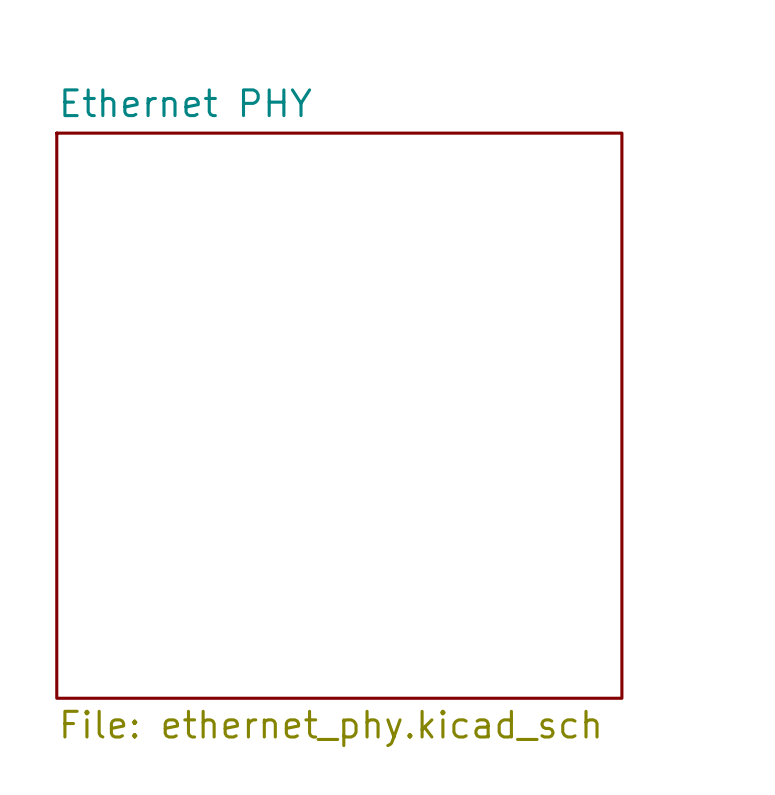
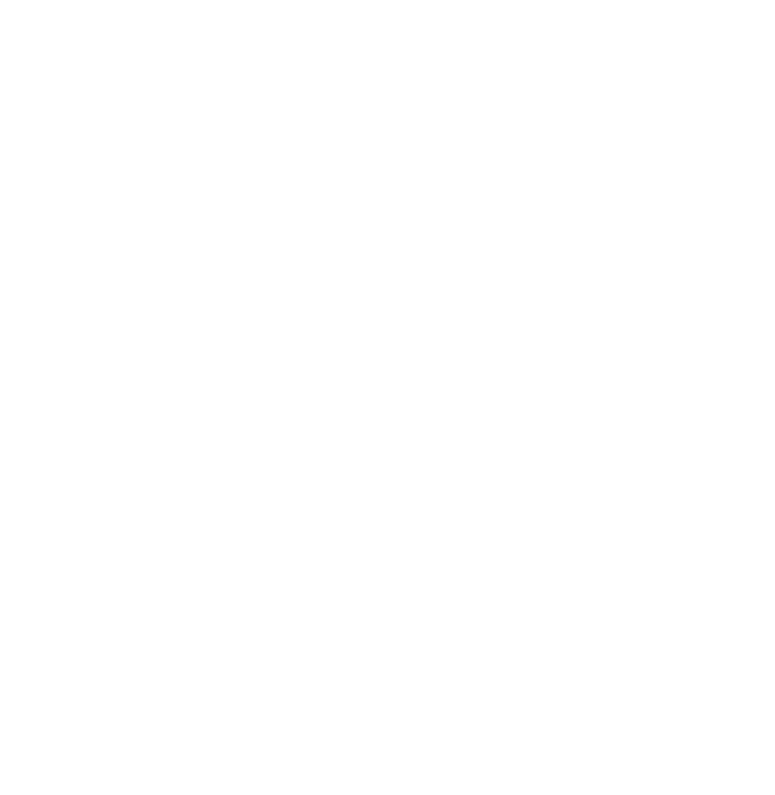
sheet Ethernet PHY: File: ethernet_phy.kicad_sch (339, 415) -> none

